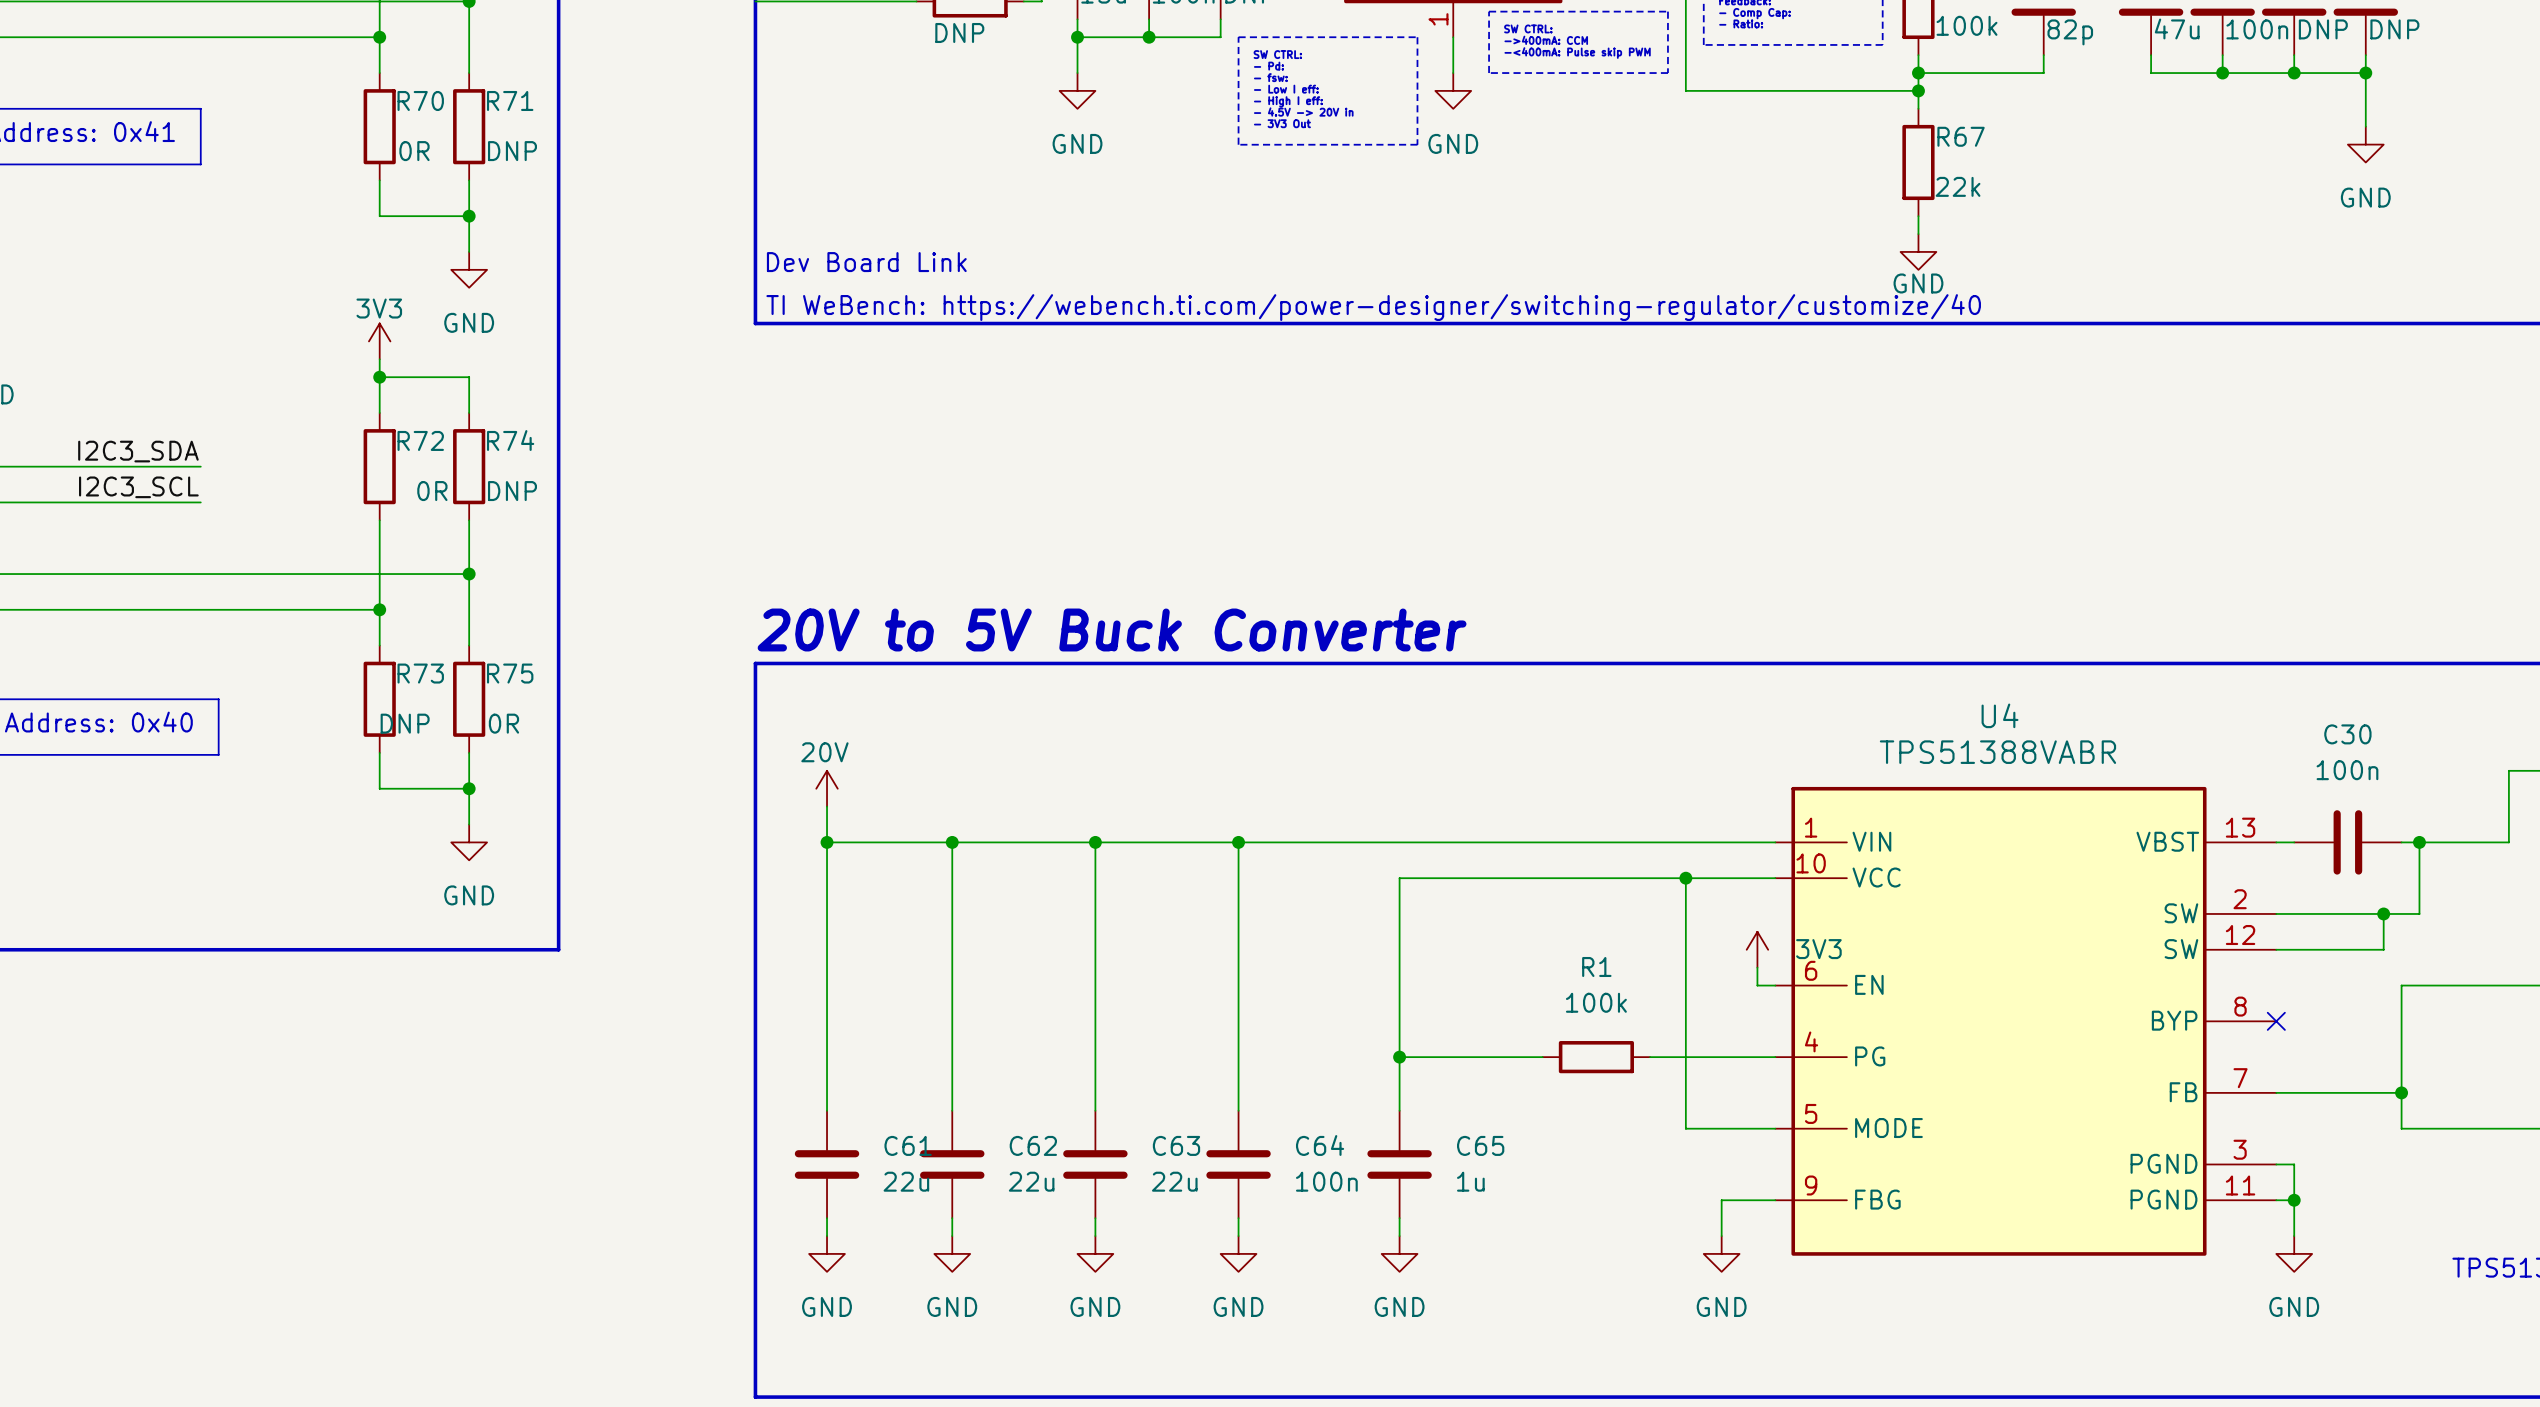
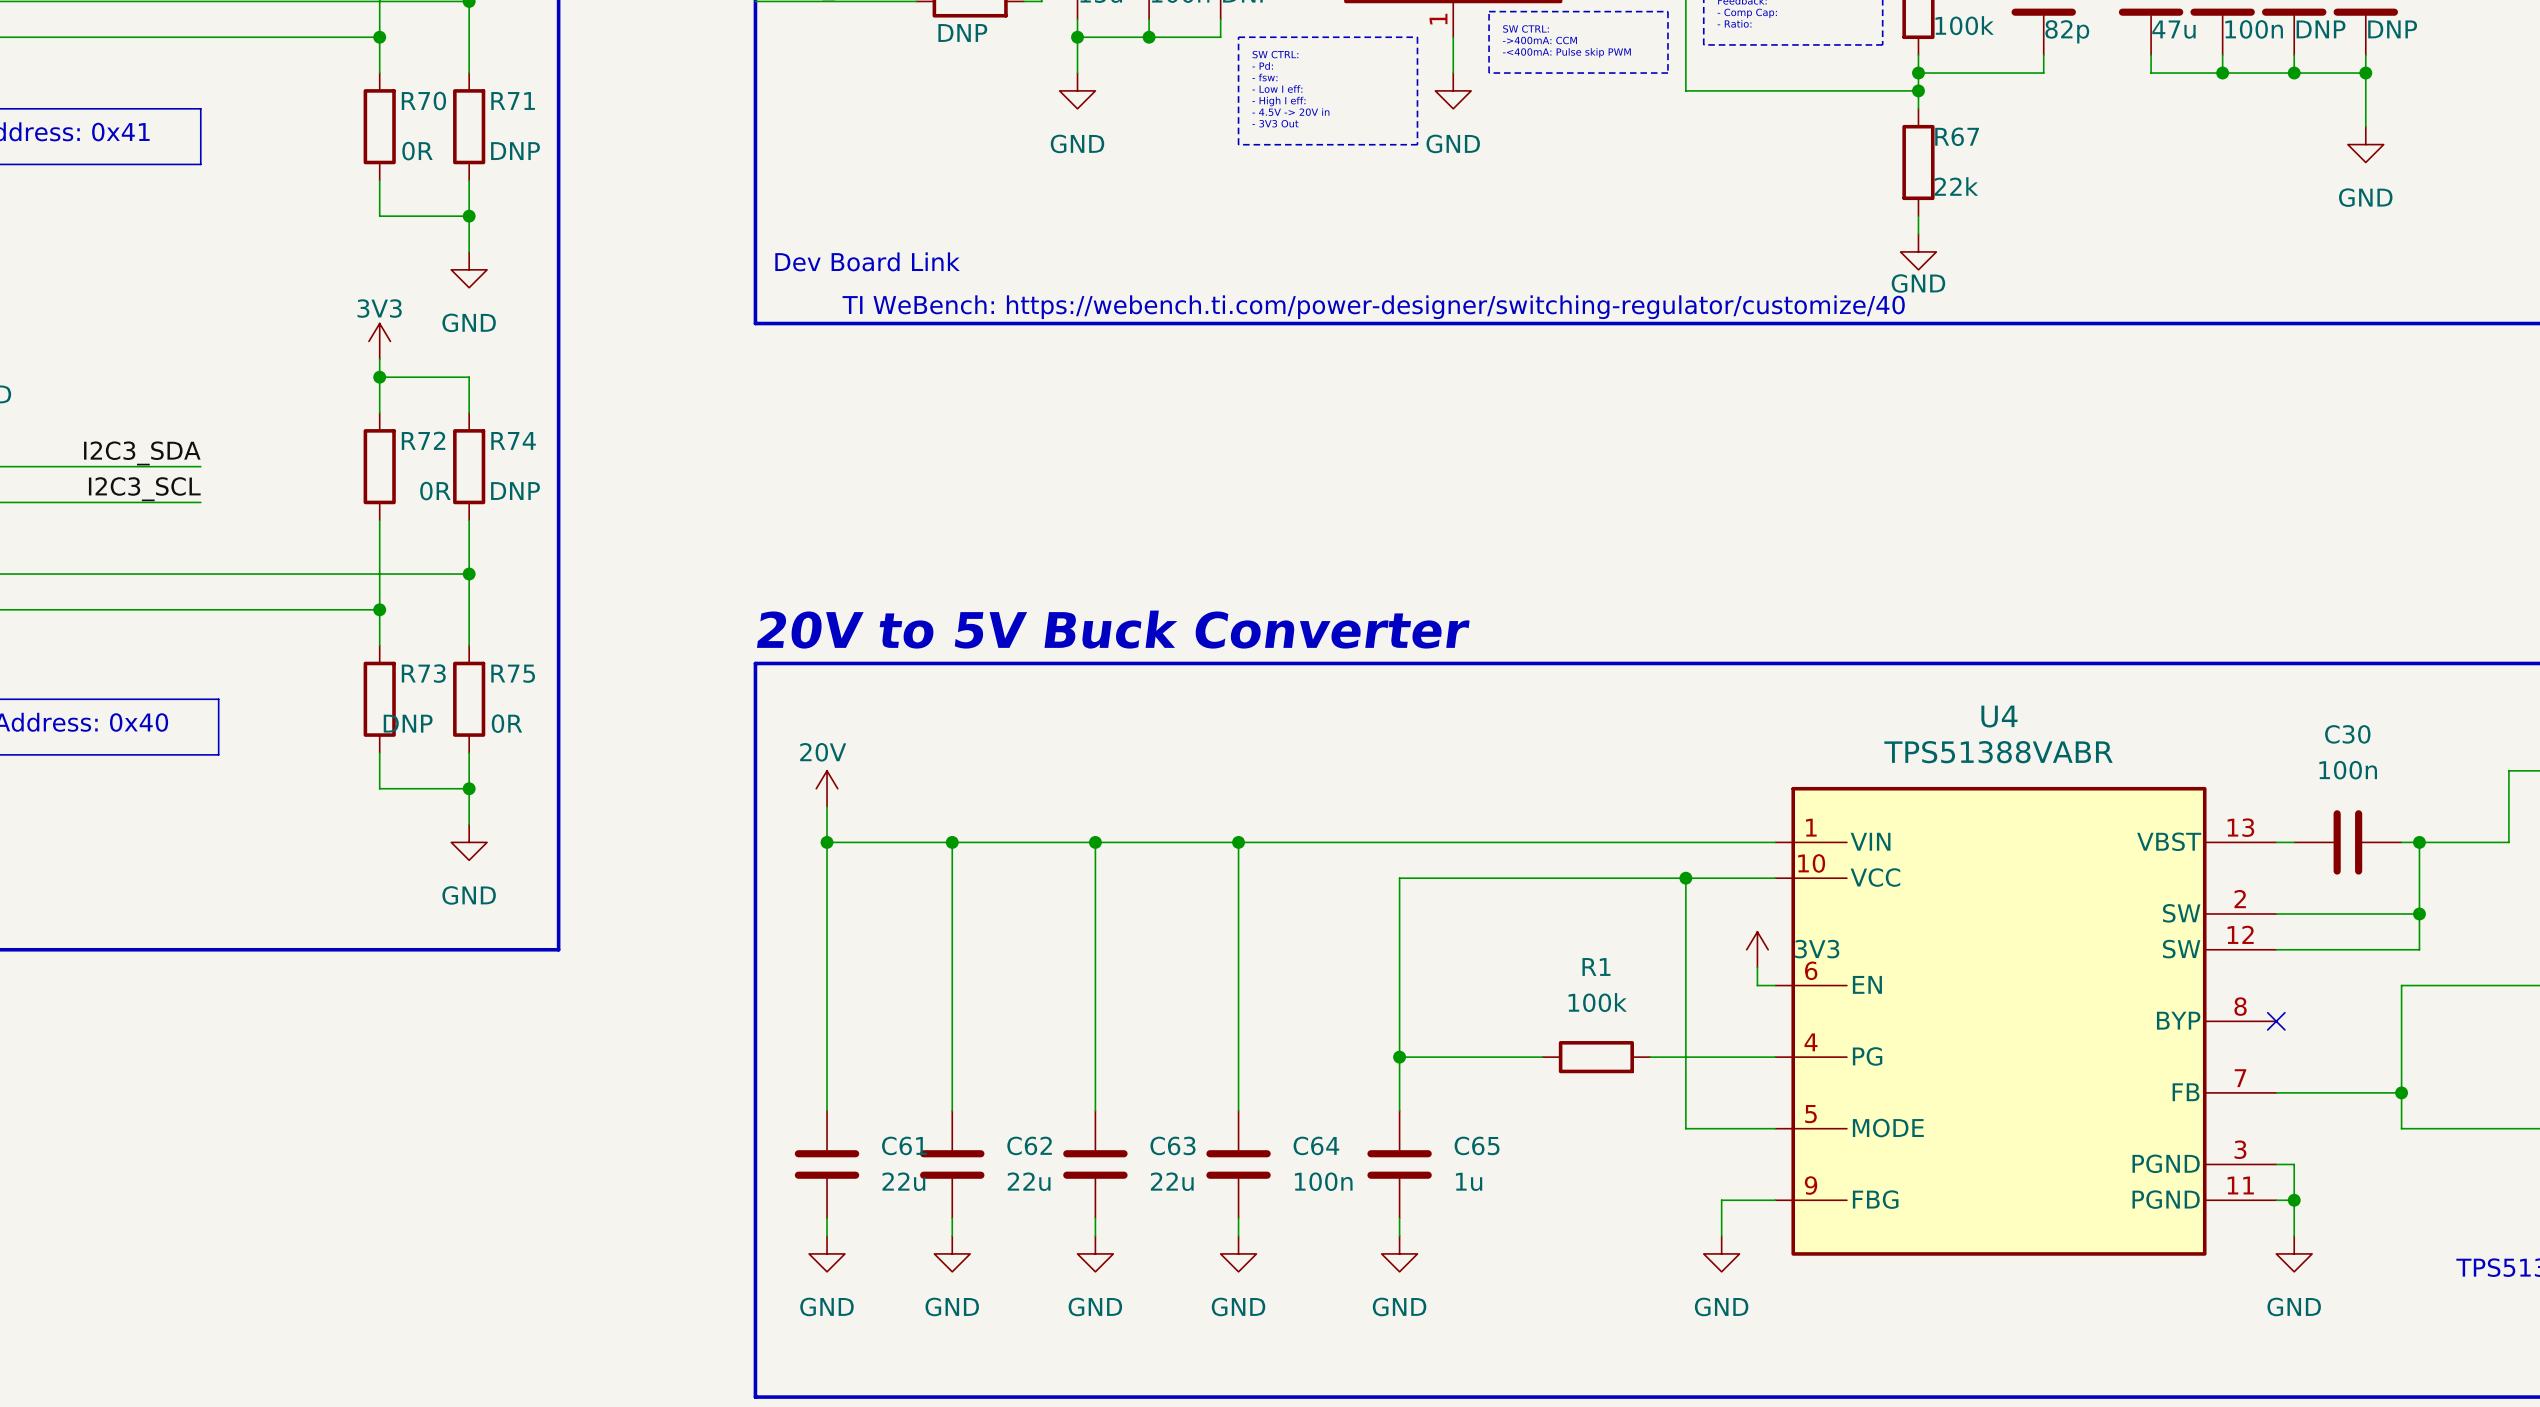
wire: (2383, 913) (2383, 949) -> (2419, 913) (2419, 949) (2383, 949)
junction position: (2383, 913) -> (2419, 913)

